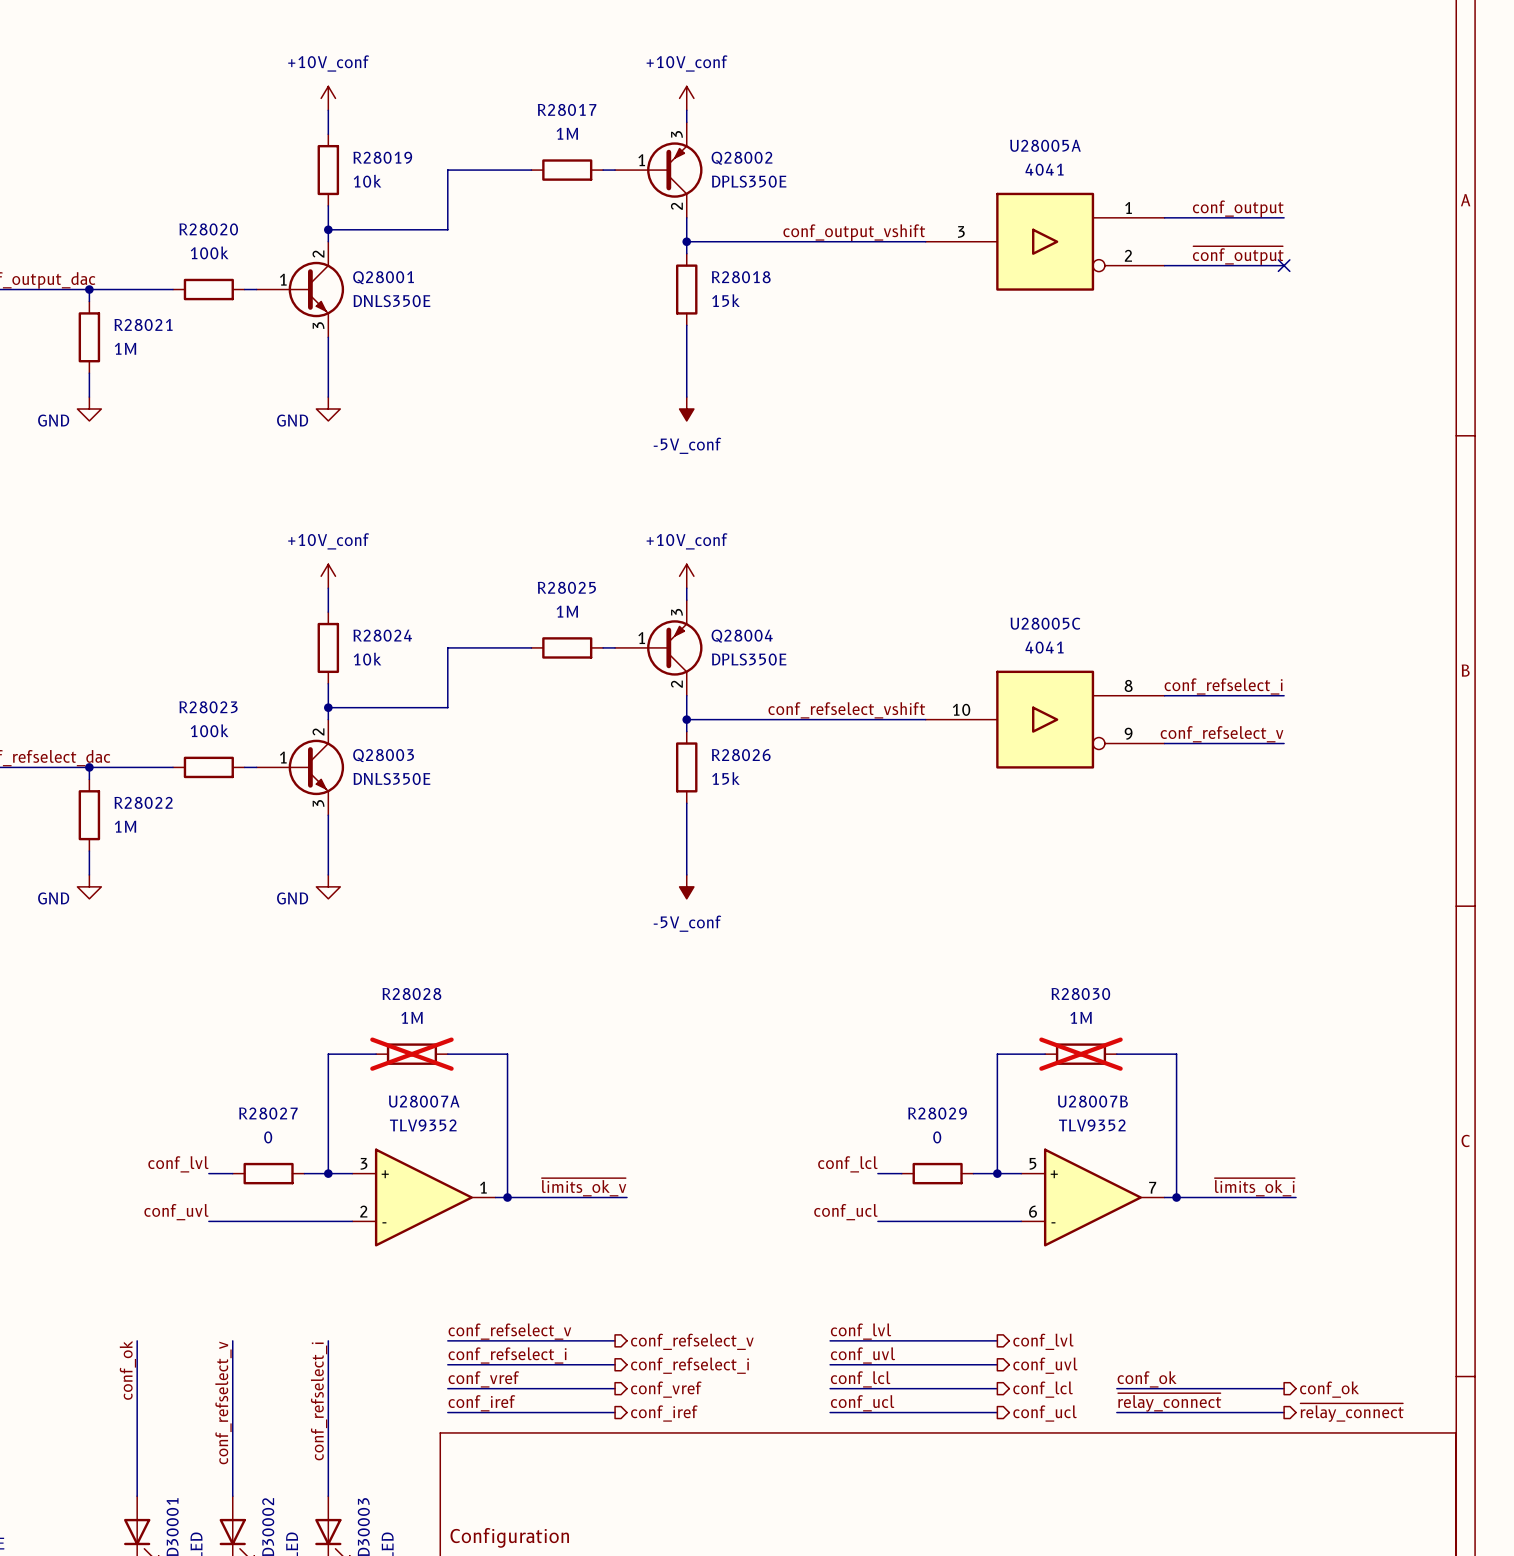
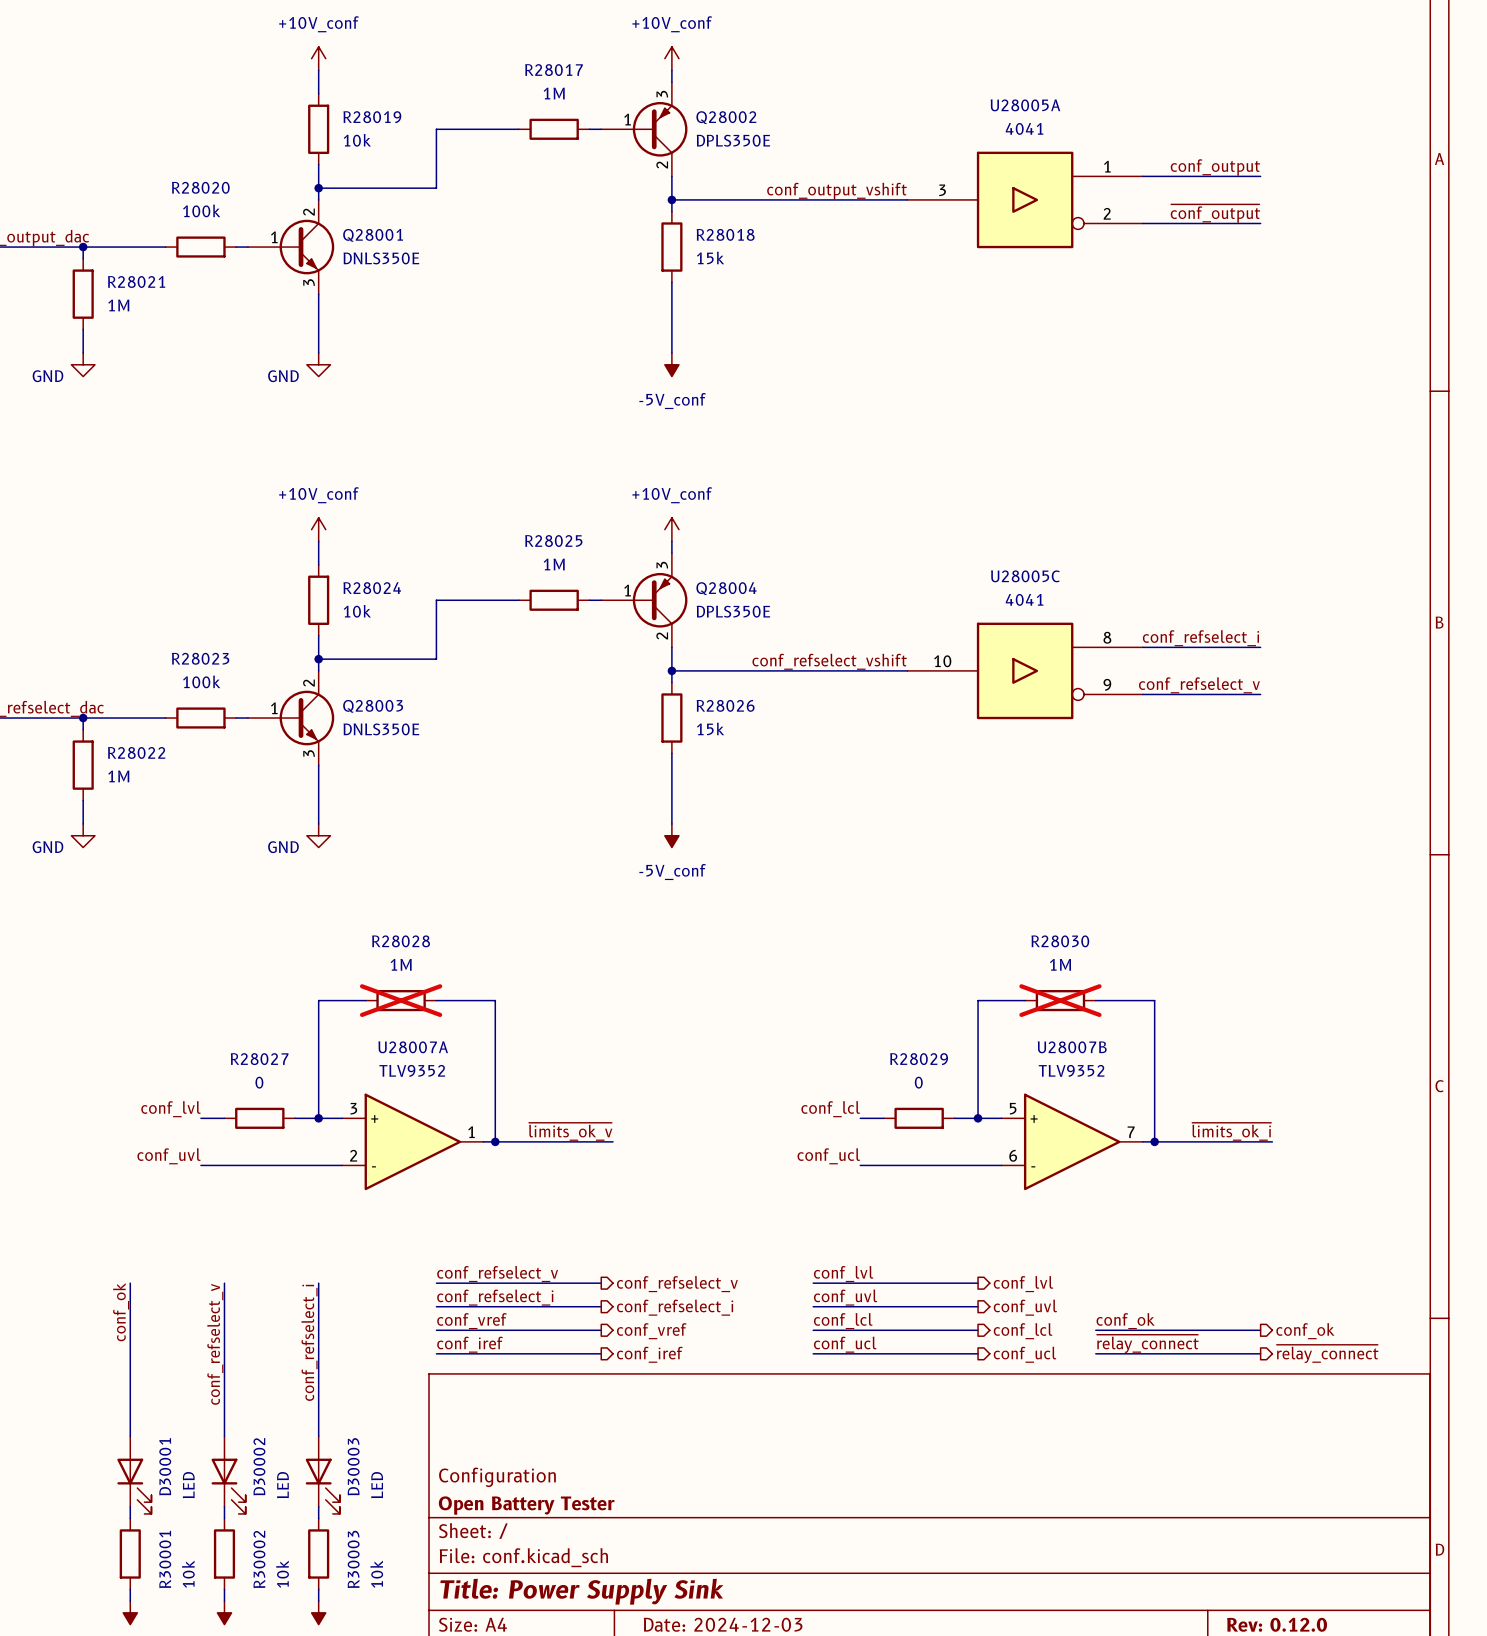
no-connect mark: (1284, 265) -> none

